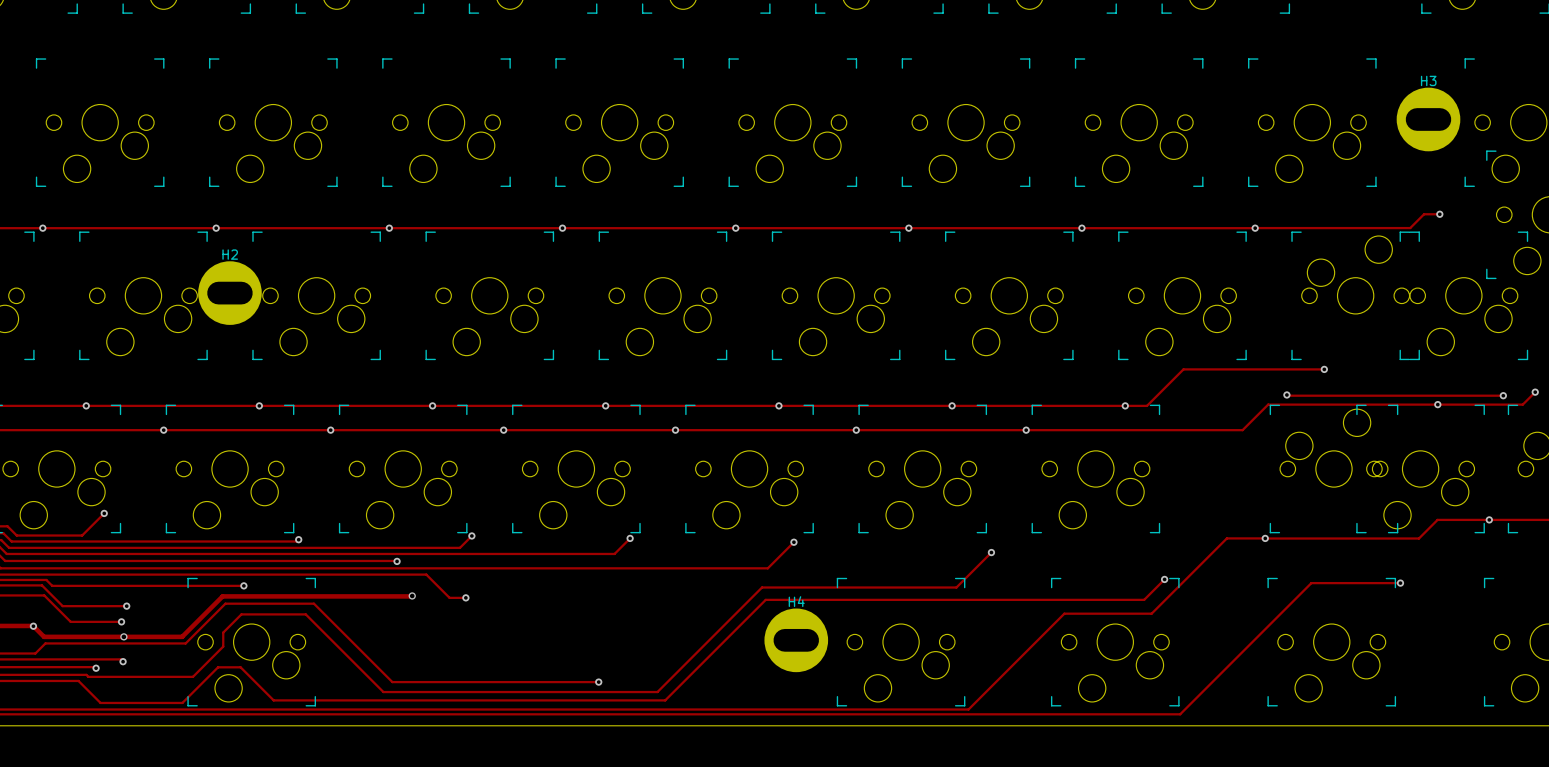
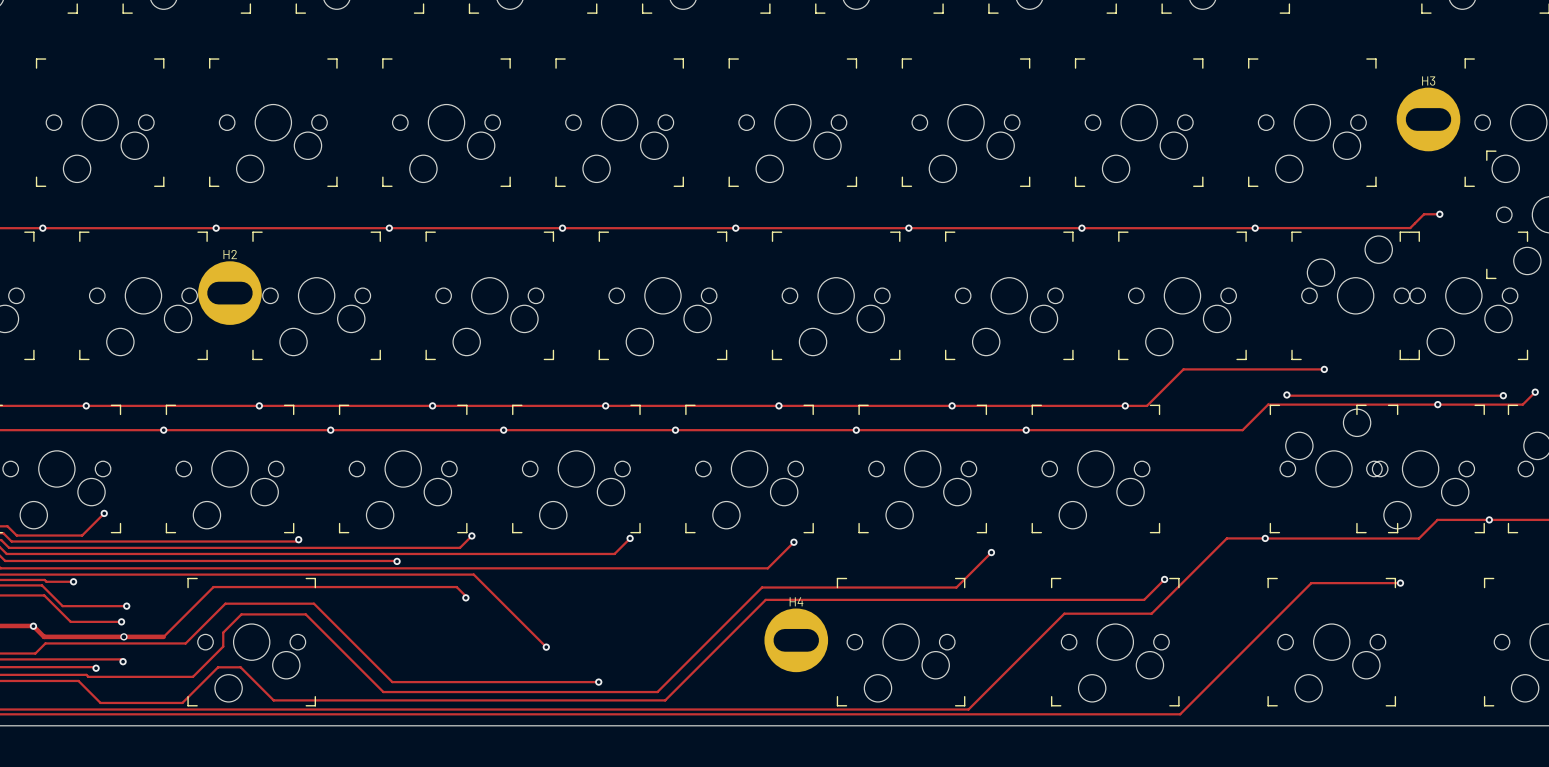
track: (426, 574) (449, 597) (465, 597) -> (426, 574) (473, 574) (546, 647)
track: (44, 579) (52, 585) (243, 585) -> (44, 579) (46, 581) (73, 581)
via: none -> (73, 581)
via: (243, 585) -> none
track: (412, 595) (222, 596) (182, 636) (163, 636) -> (467, 597) (456, 587) (213, 587) (163, 636)
via: (412, 595) -> none
via: none -> (546, 647)

